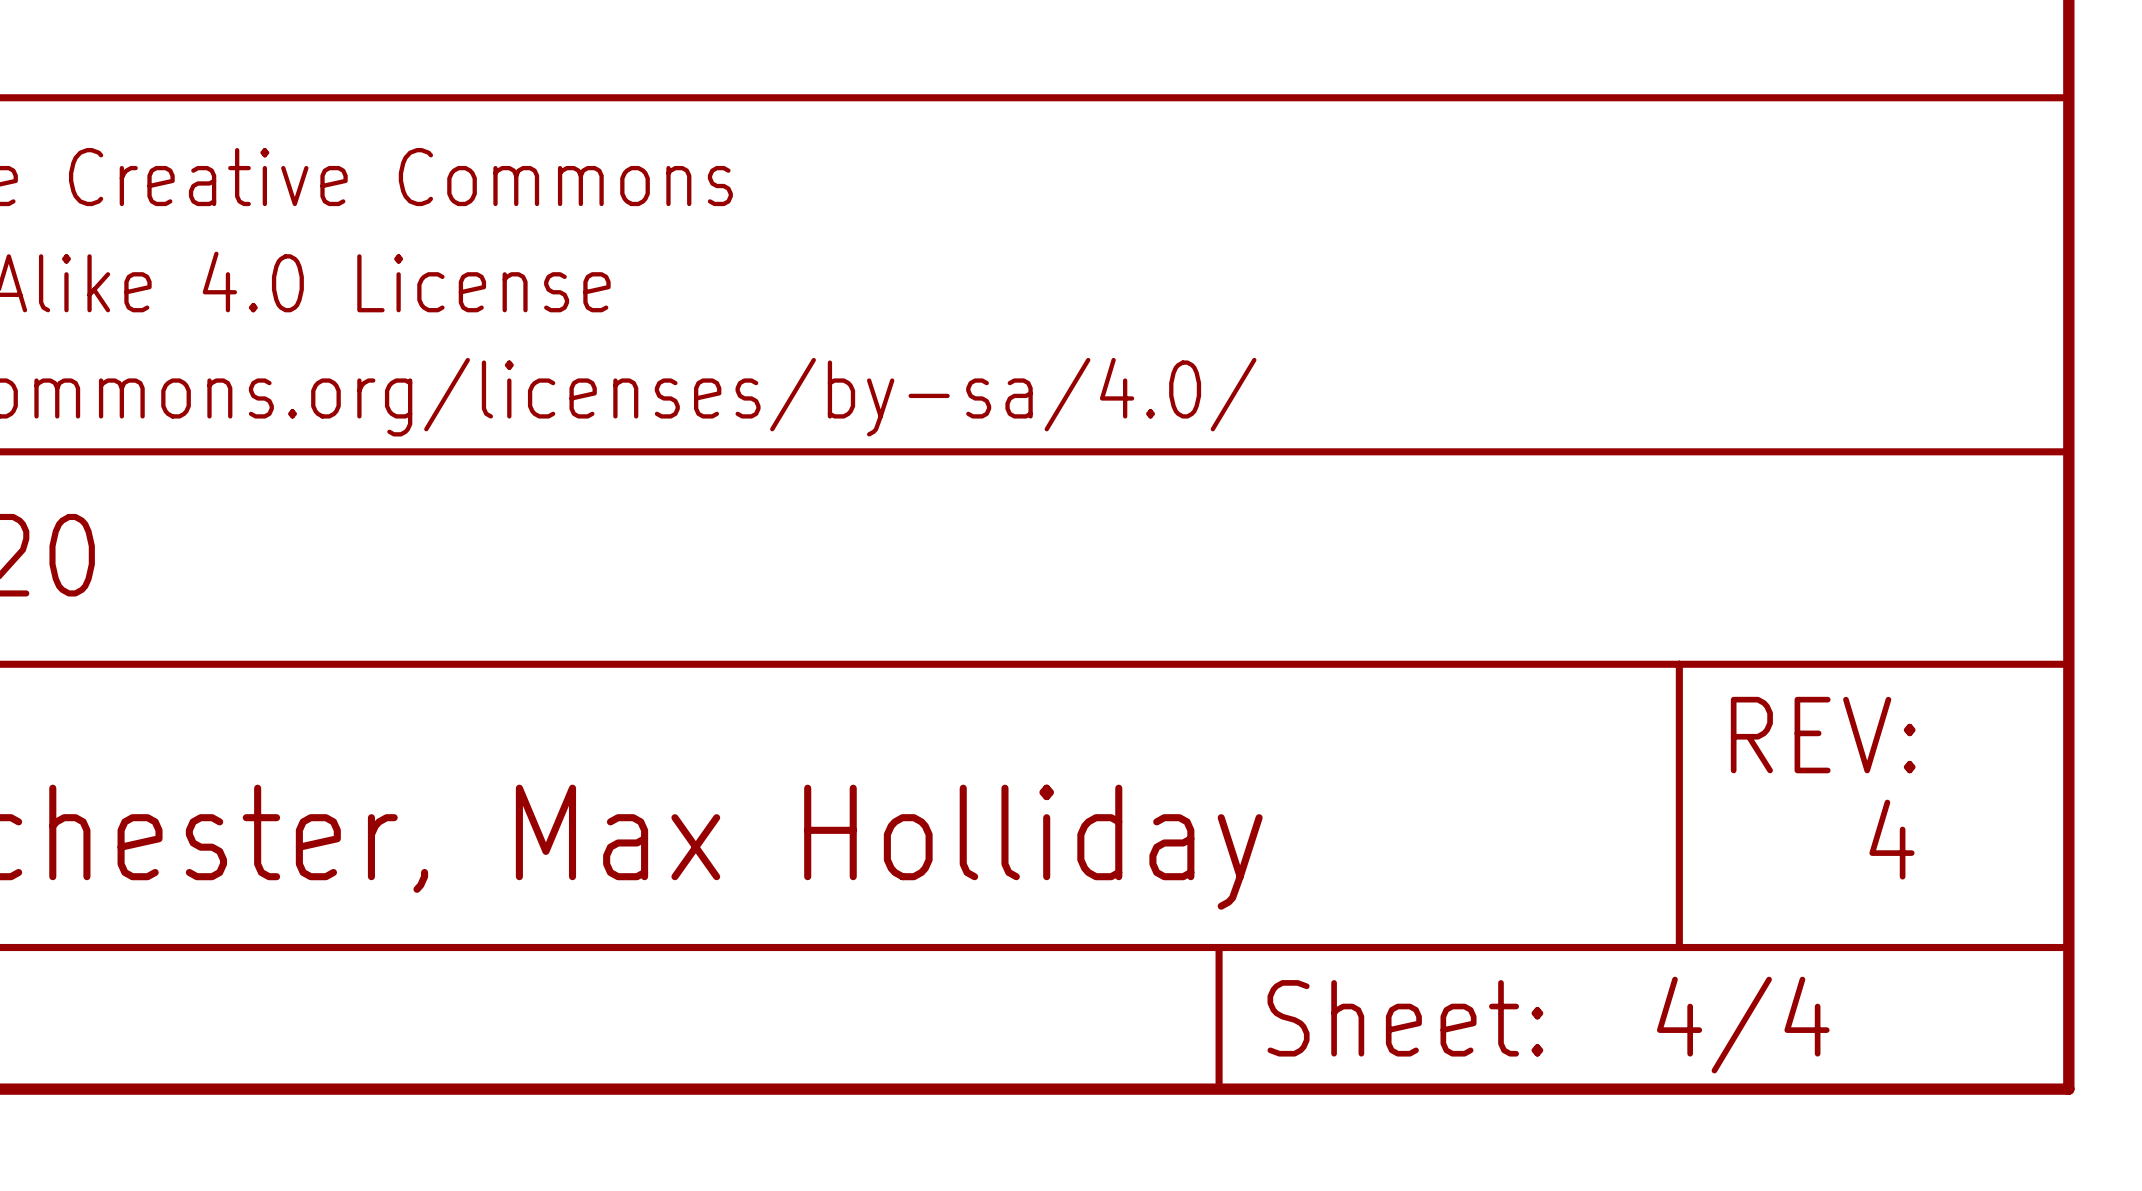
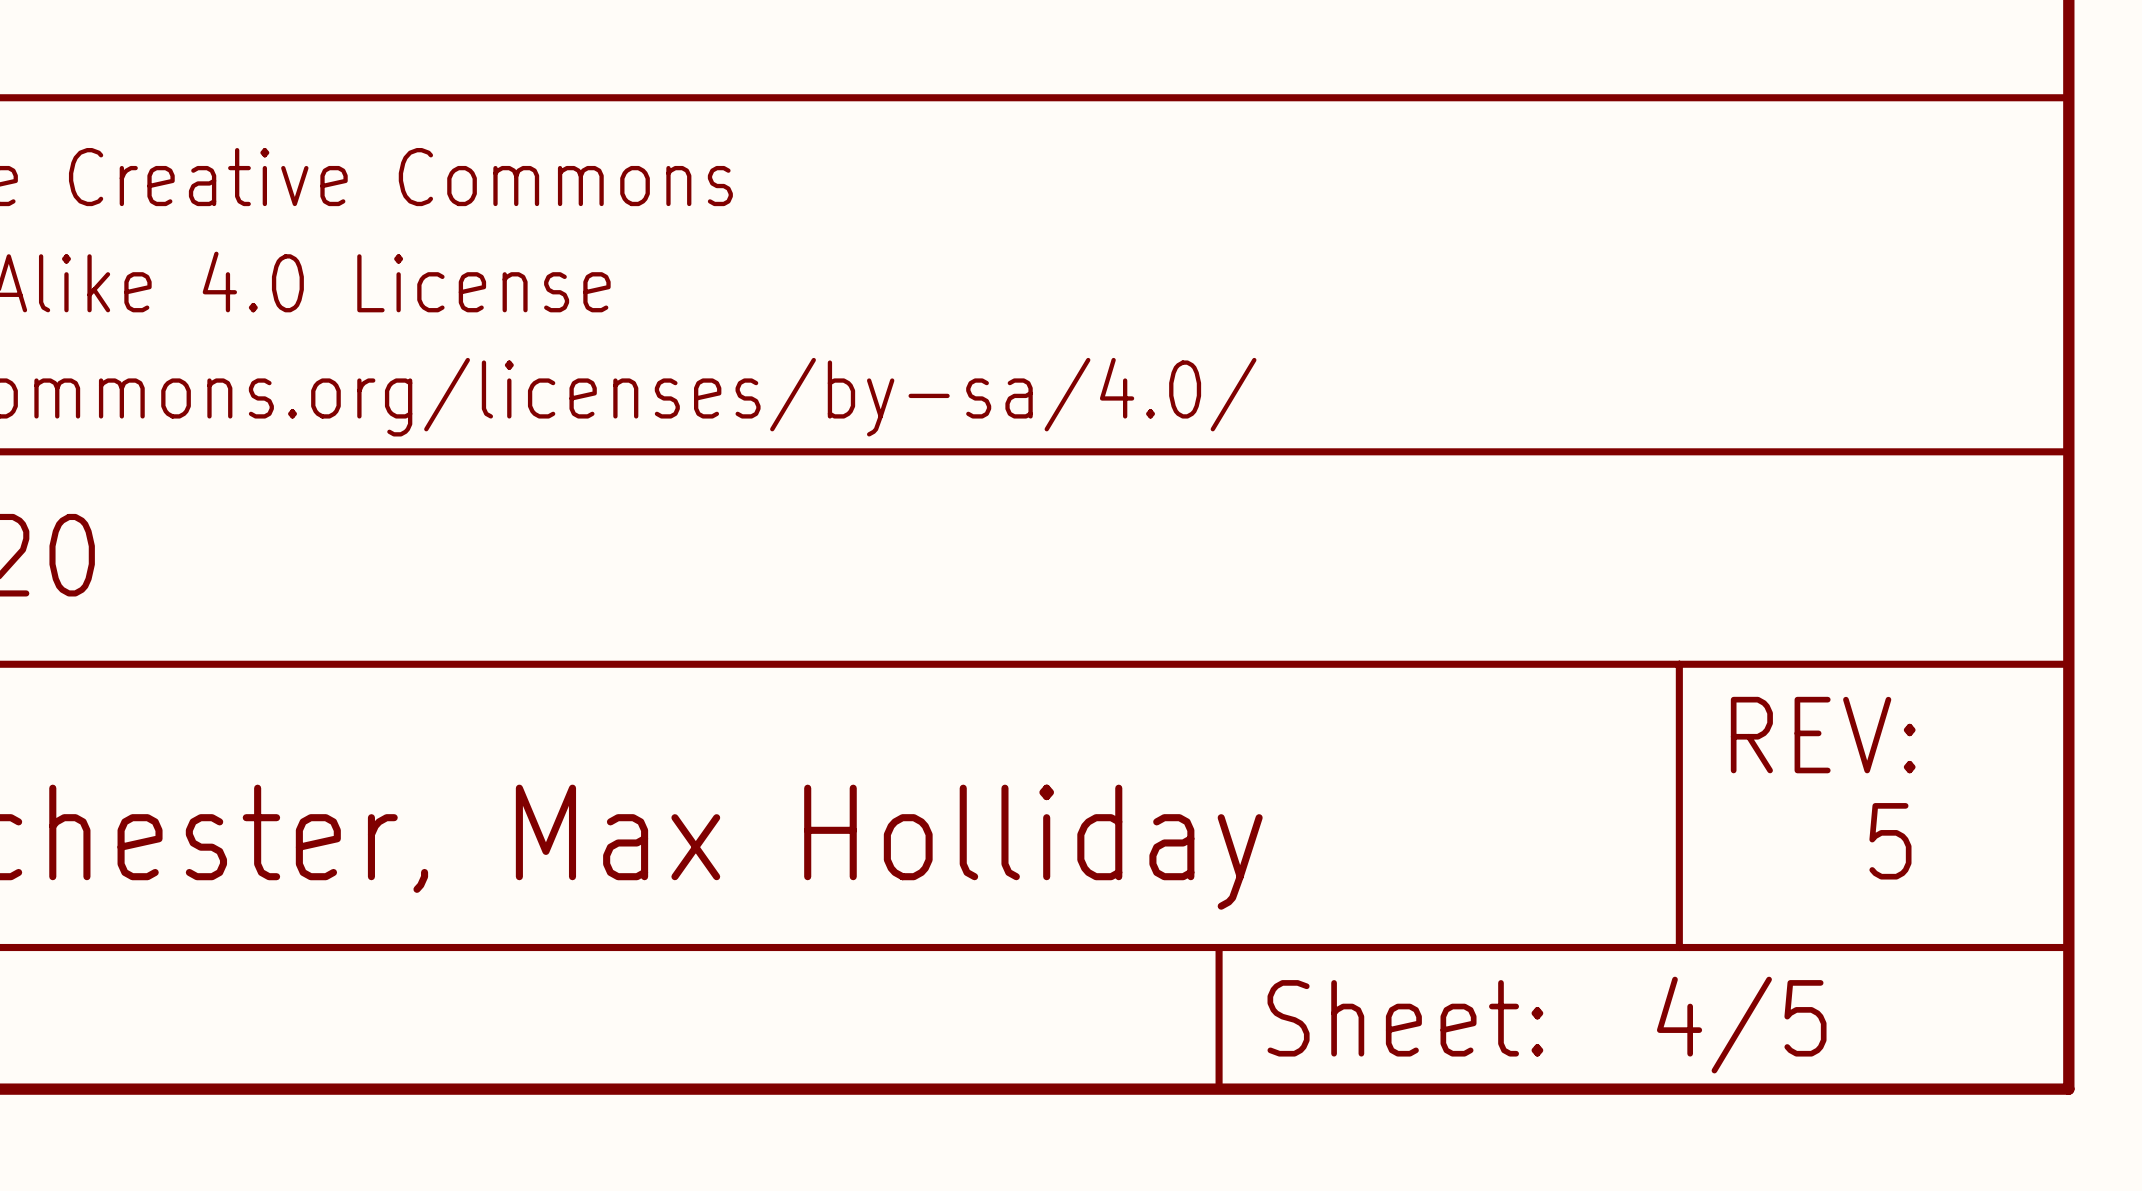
text: 4 (1891, 839) -> 5 (1890, 841)
part text: 4/4 (1743, 1025) -> 4/5 (1741, 1025)

